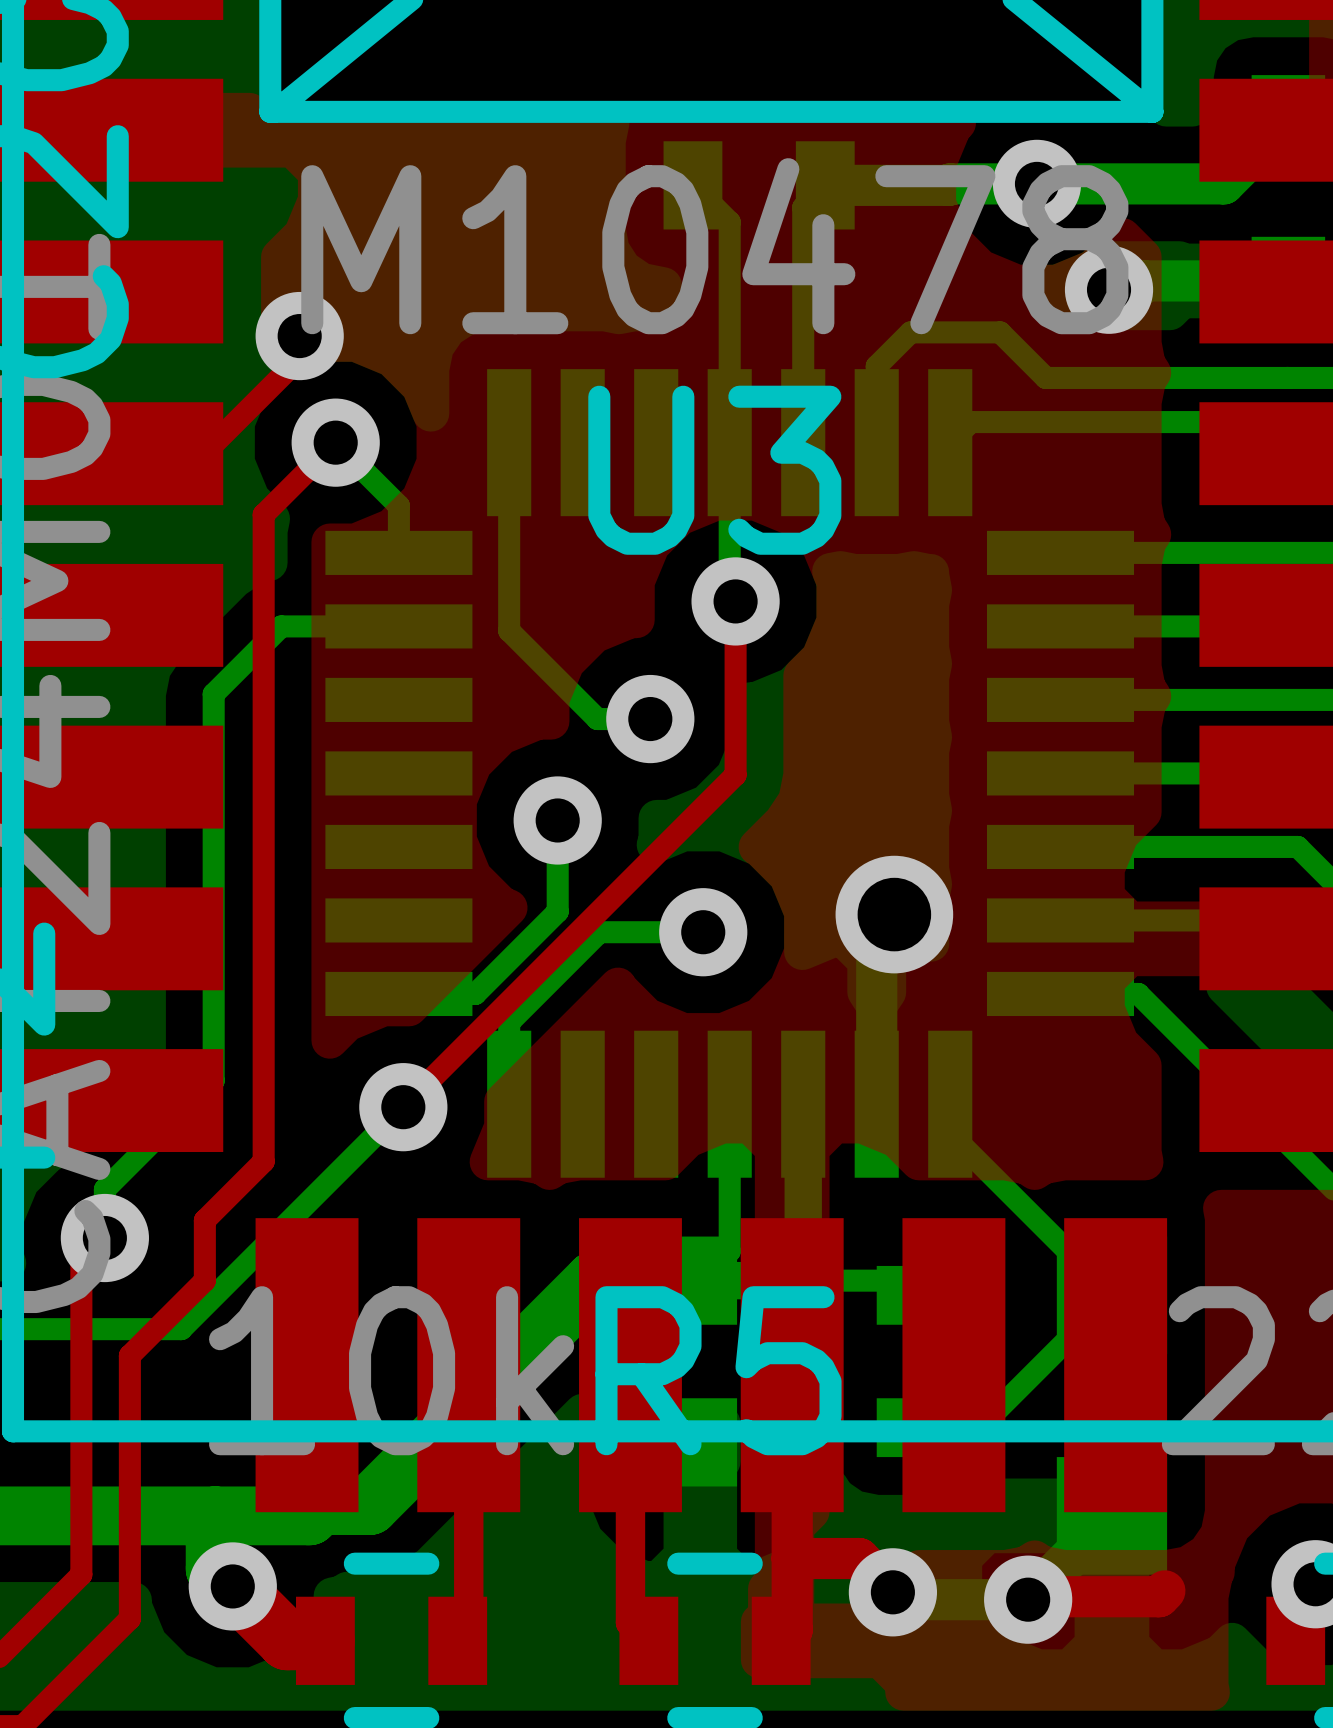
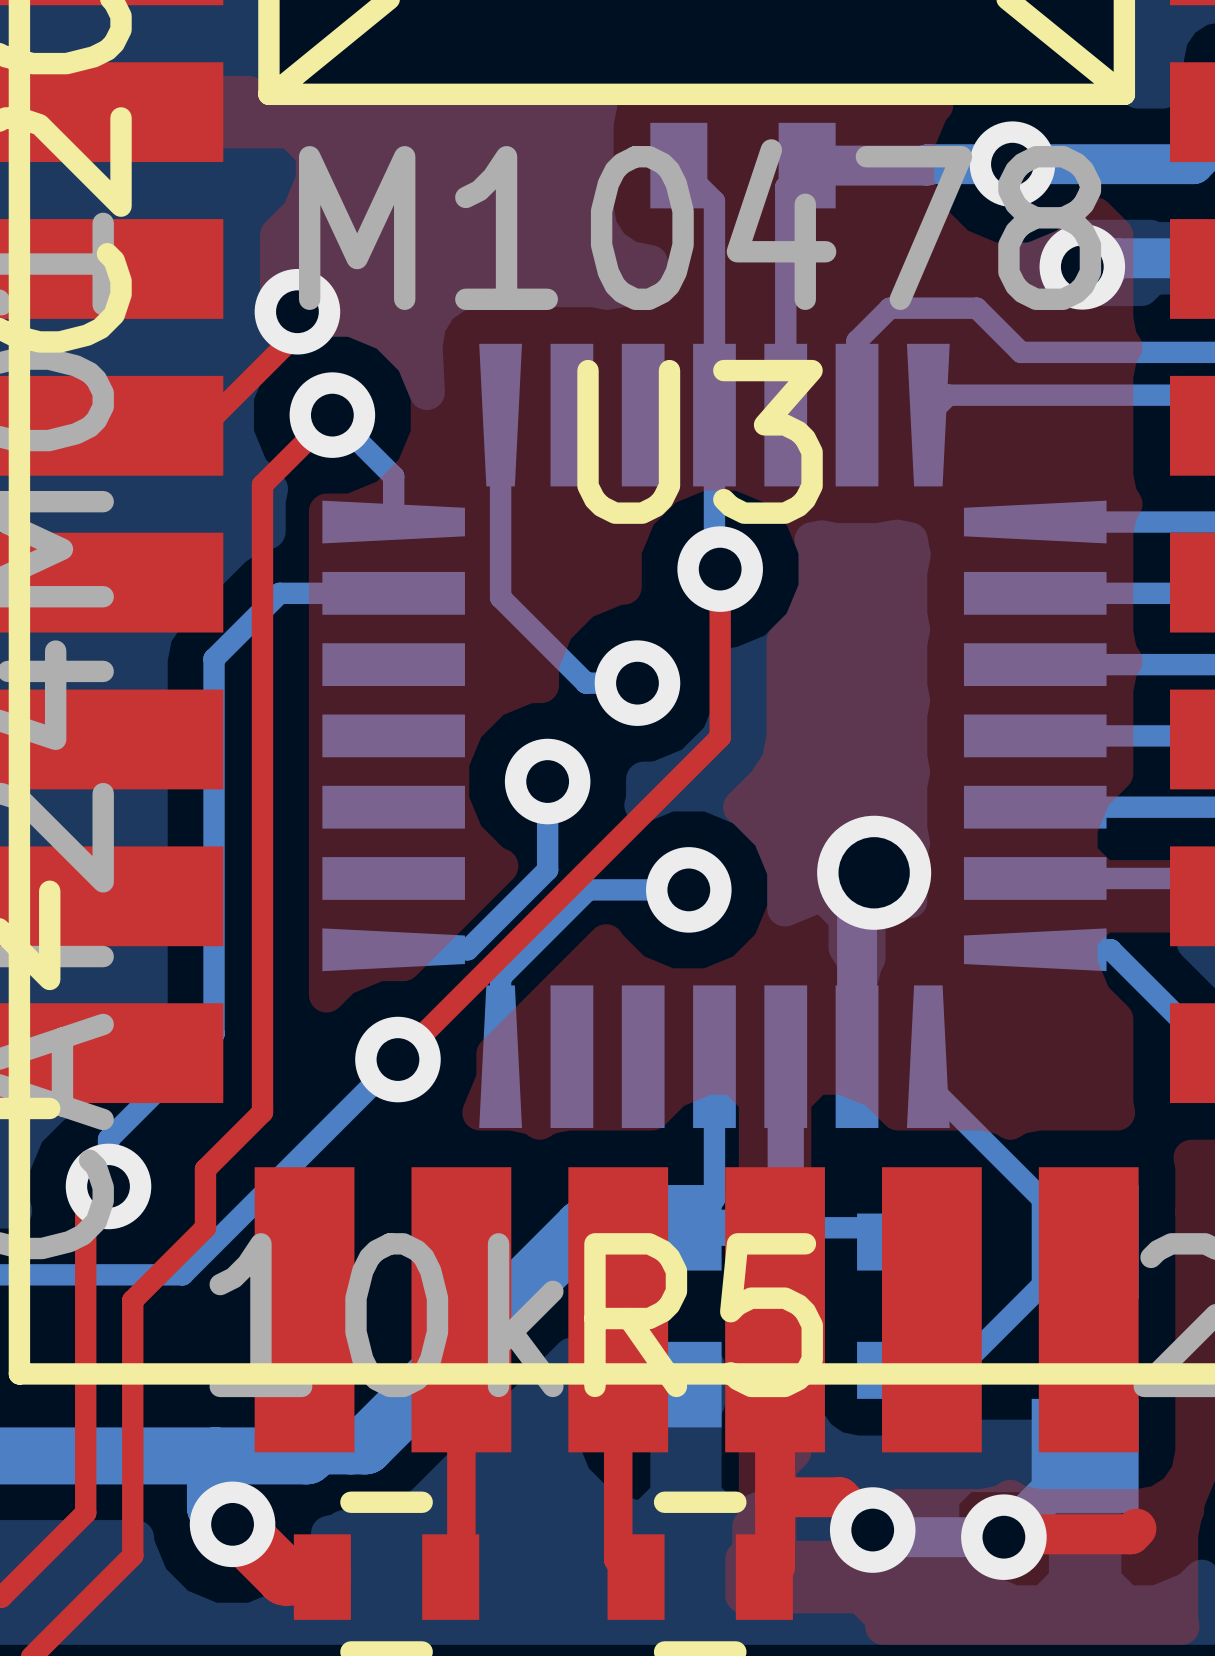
part footprint: [325, 369, 1135, 1178] -> [322, 343, 1107, 1128]

